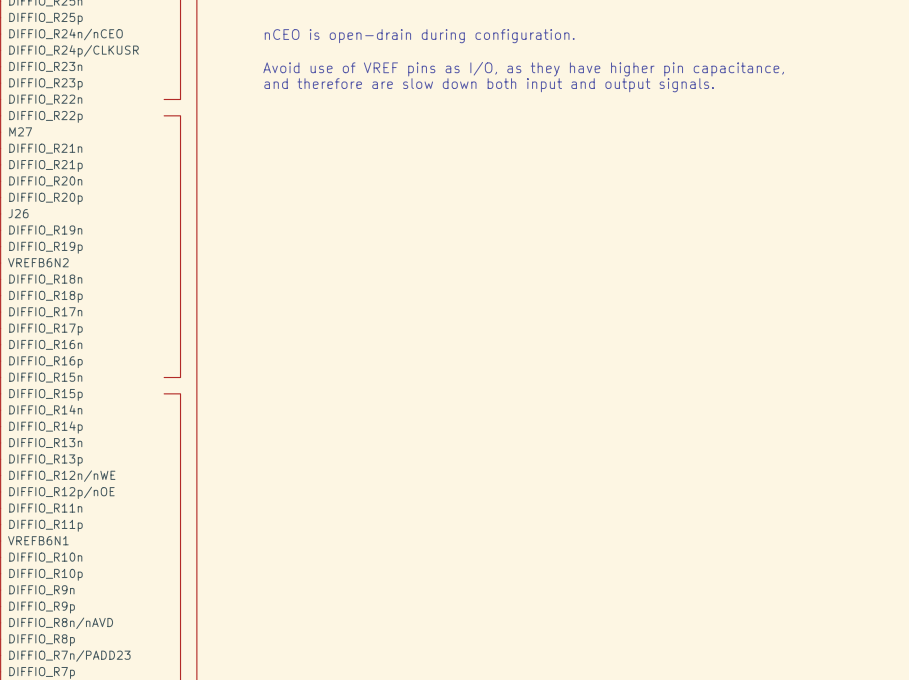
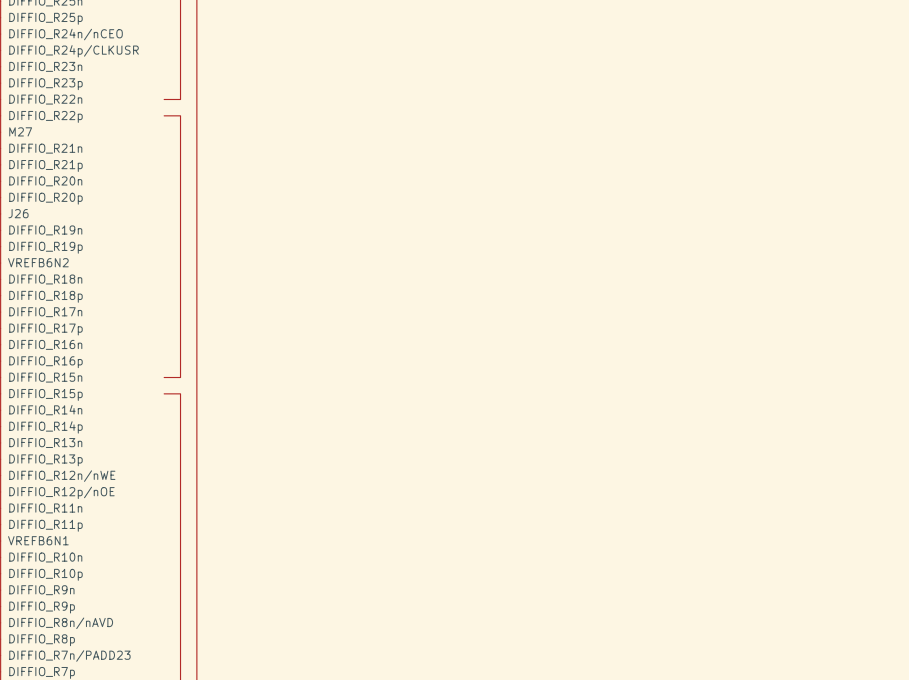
text: nCEO is open-drain during configuration. (419, 36) -> none
text: Avoid use of VREF pins as I/O, as they have higher pin capacitance, (523, 69) -> none
text: and therefore are slow down both input and output signals. (489, 85) -> none

